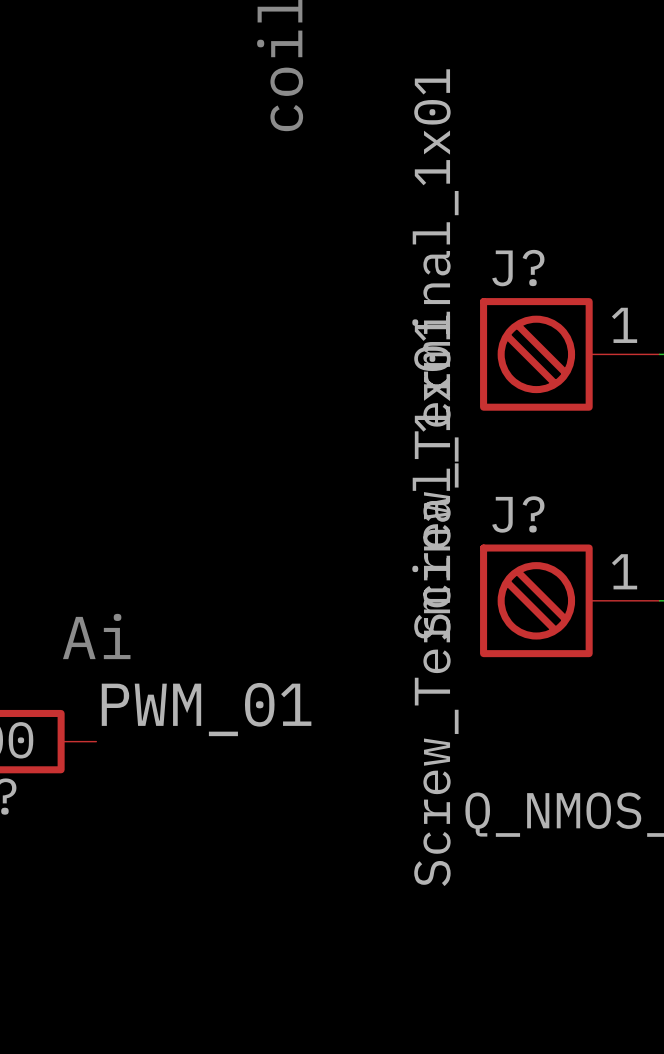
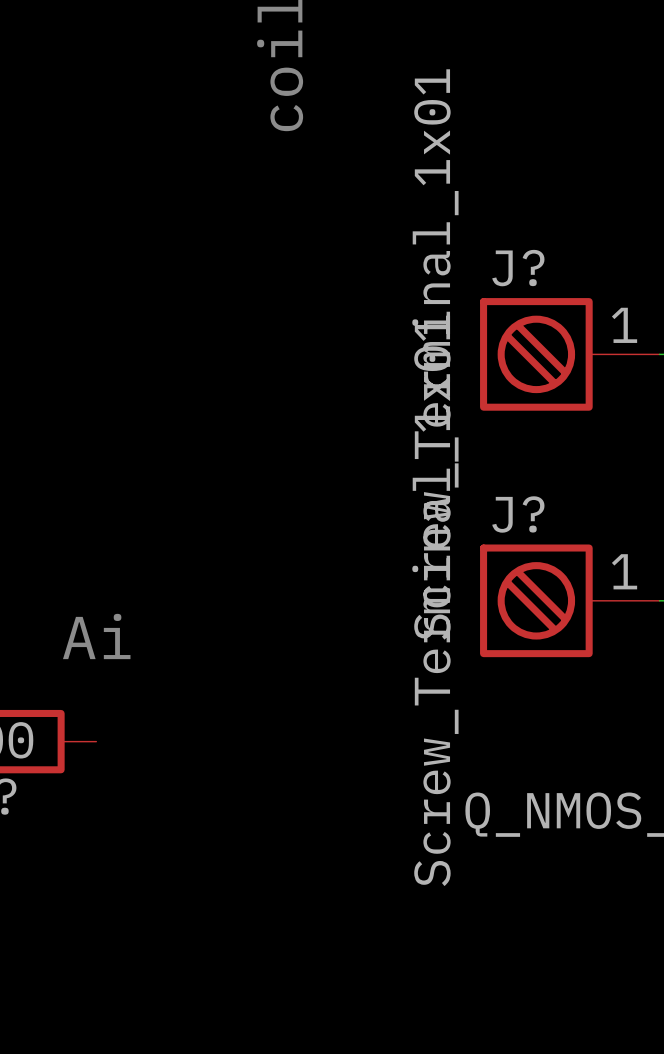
label: PWM_01 (206, 709) -> none

